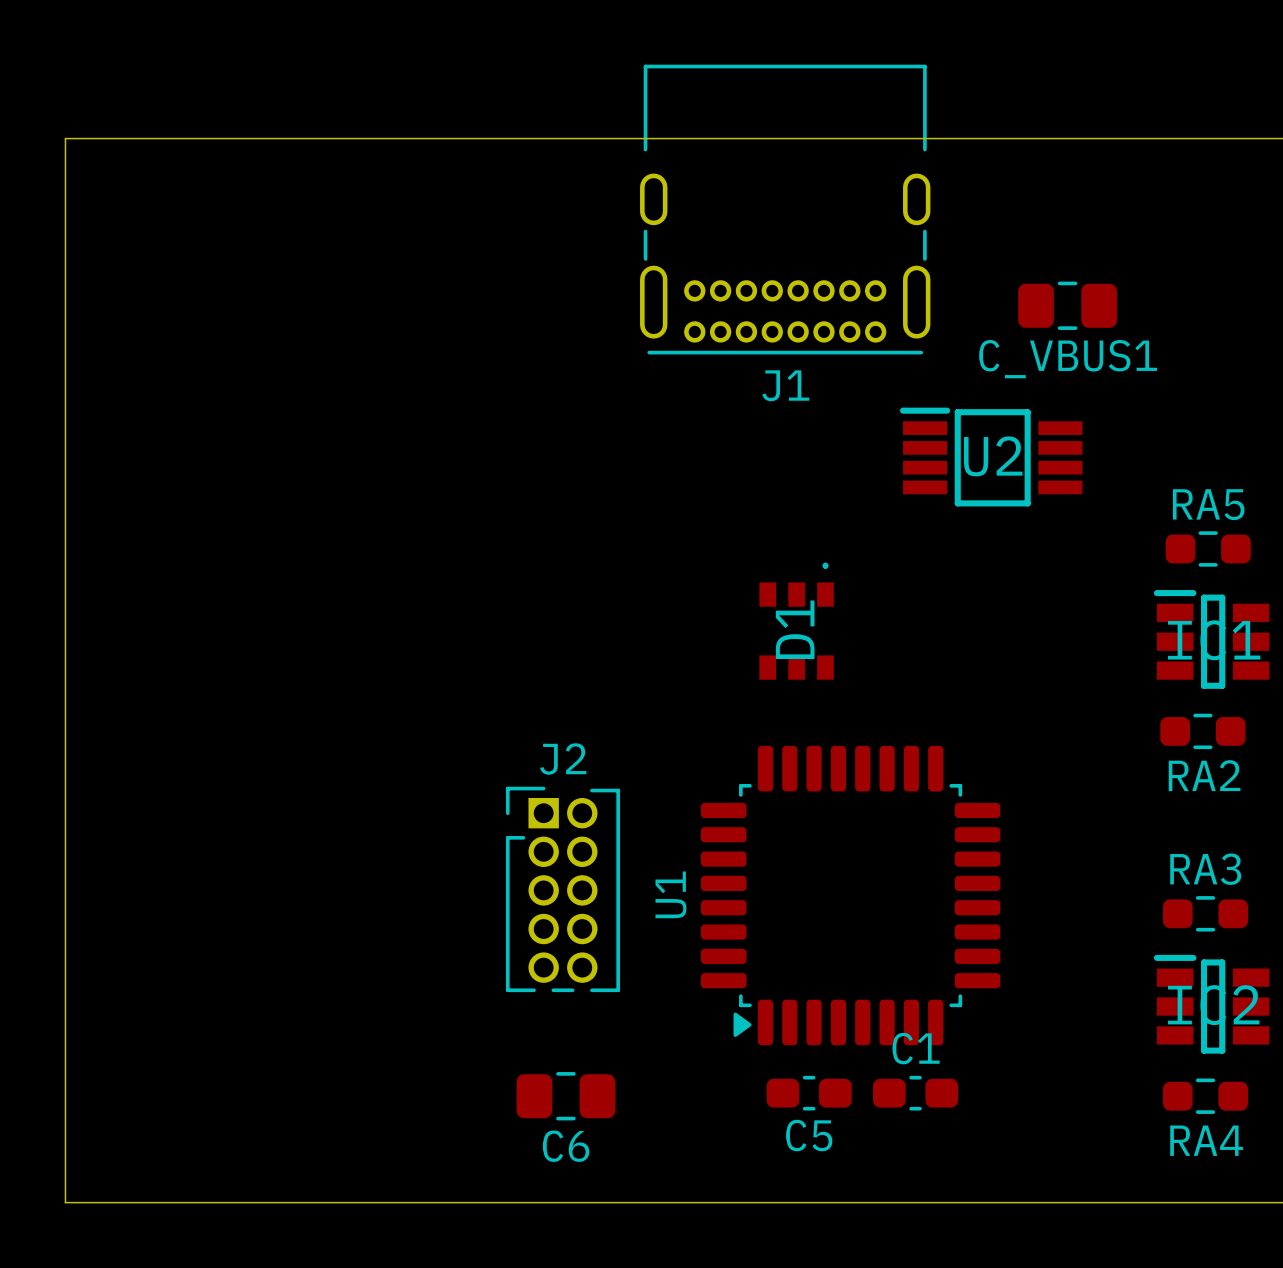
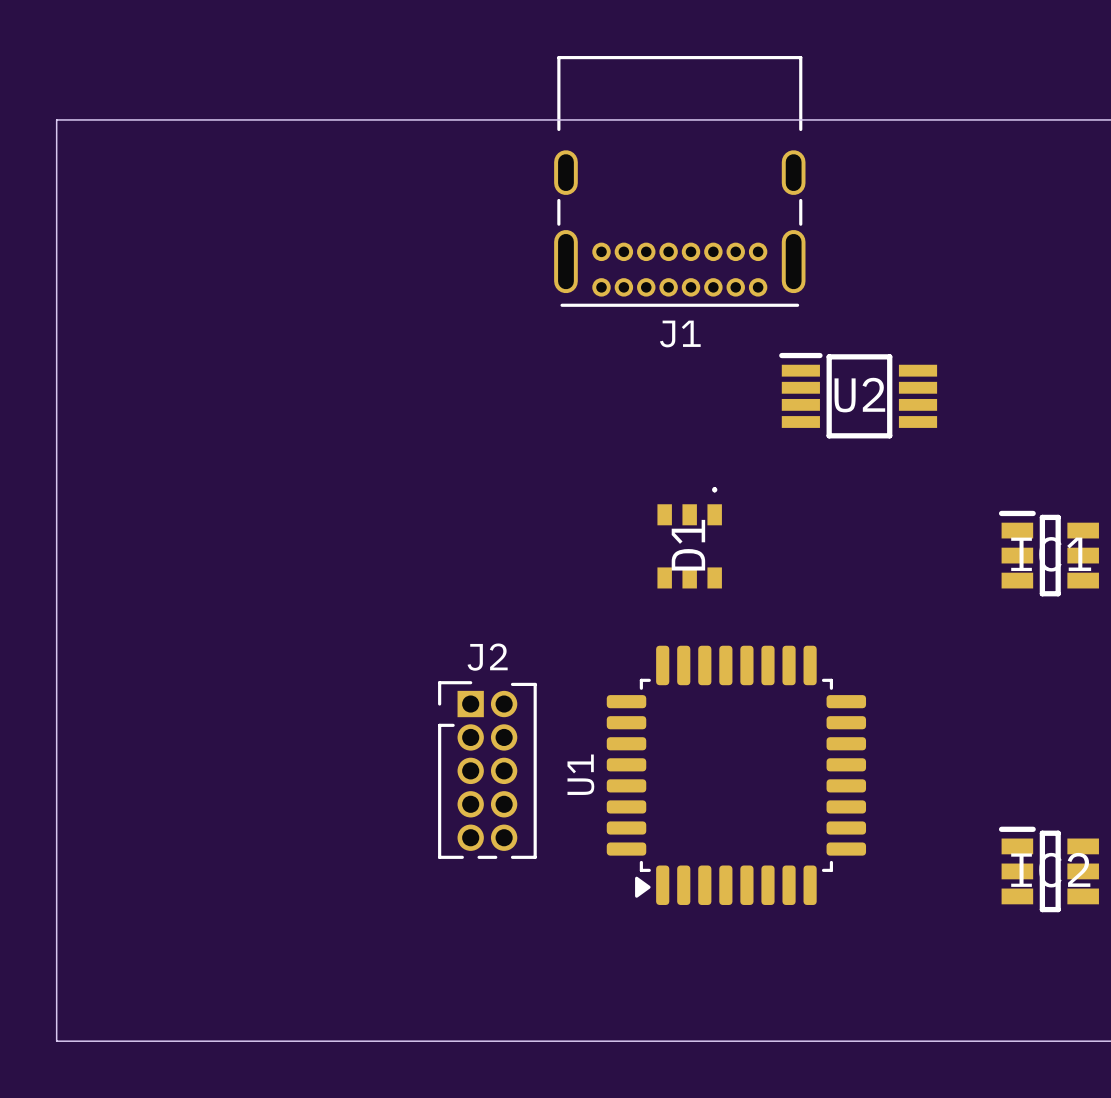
C_VBUS1: (1067, 305) -> none
RA5: (1208, 549) -> none
RA2: (1202, 731) -> none
RA3: (1205, 913) -> none
C5: (809, 1093) -> none
C1: (915, 1093) -> none
C6: (565, 1096) -> none
RA4: (1205, 1096) -> none

